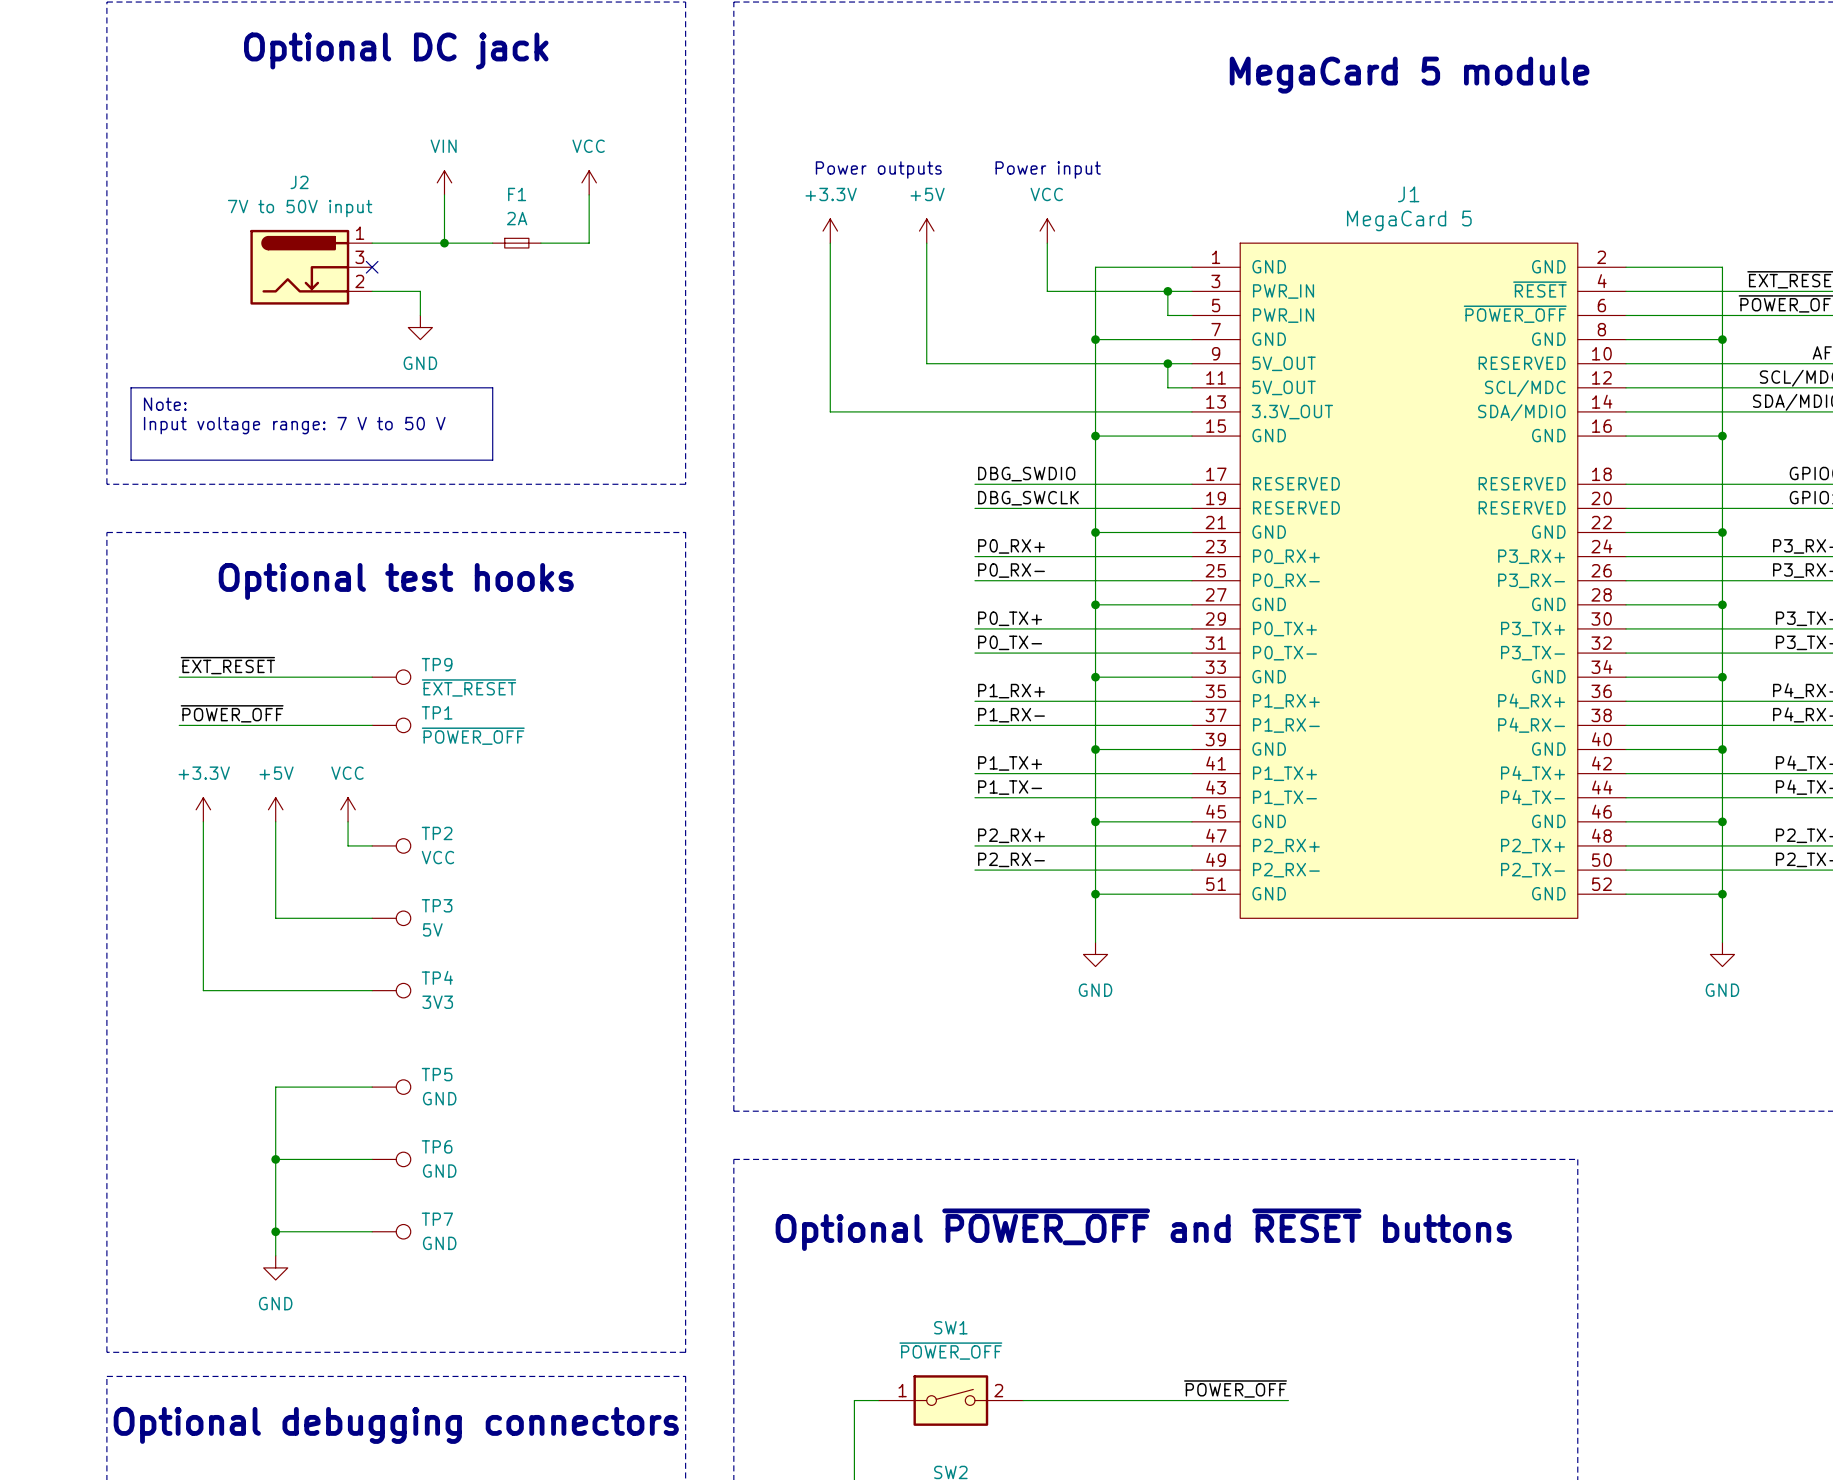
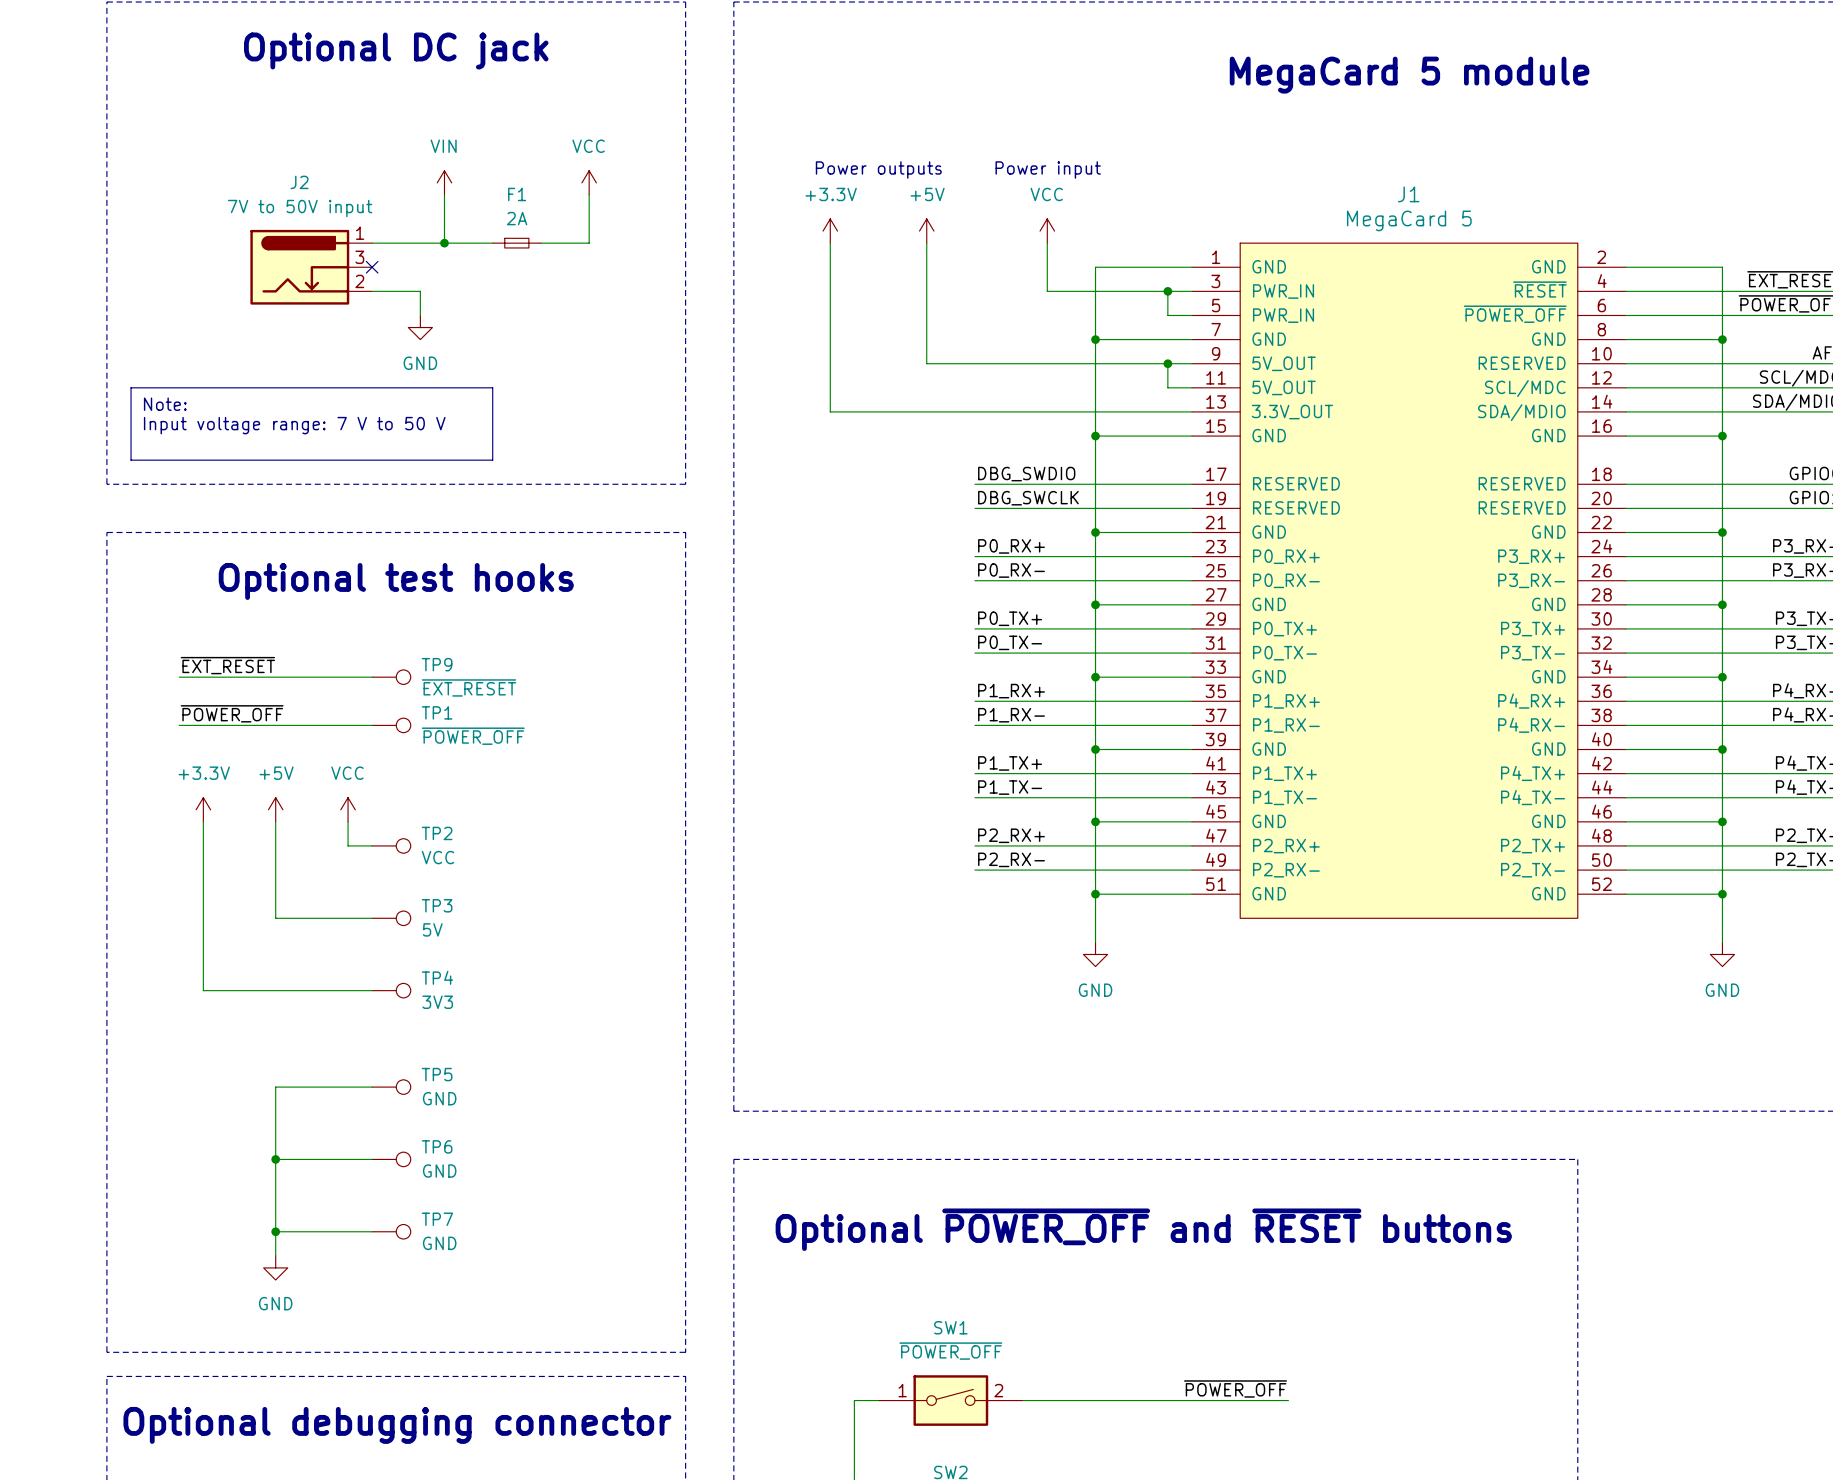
text: Optional debugging connectors (396, 1425) -> Optional debugging connector (397, 1425)

